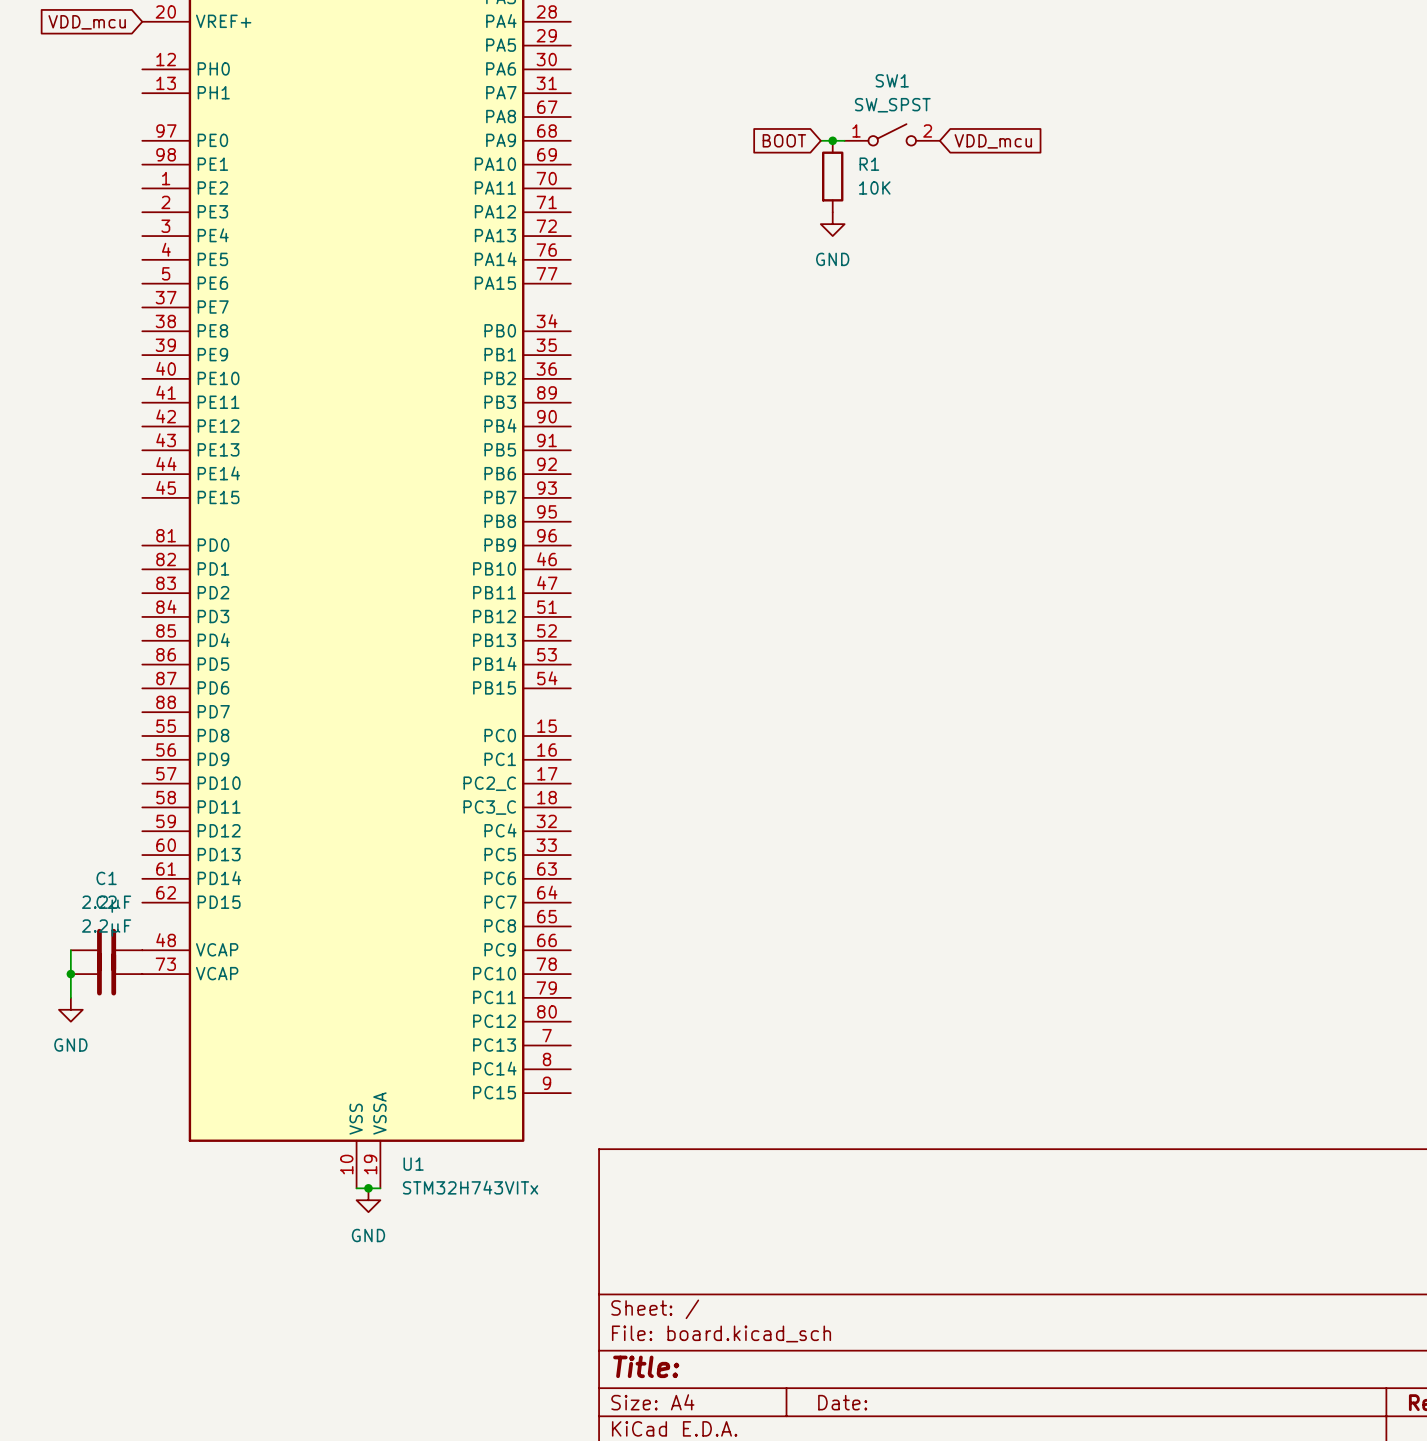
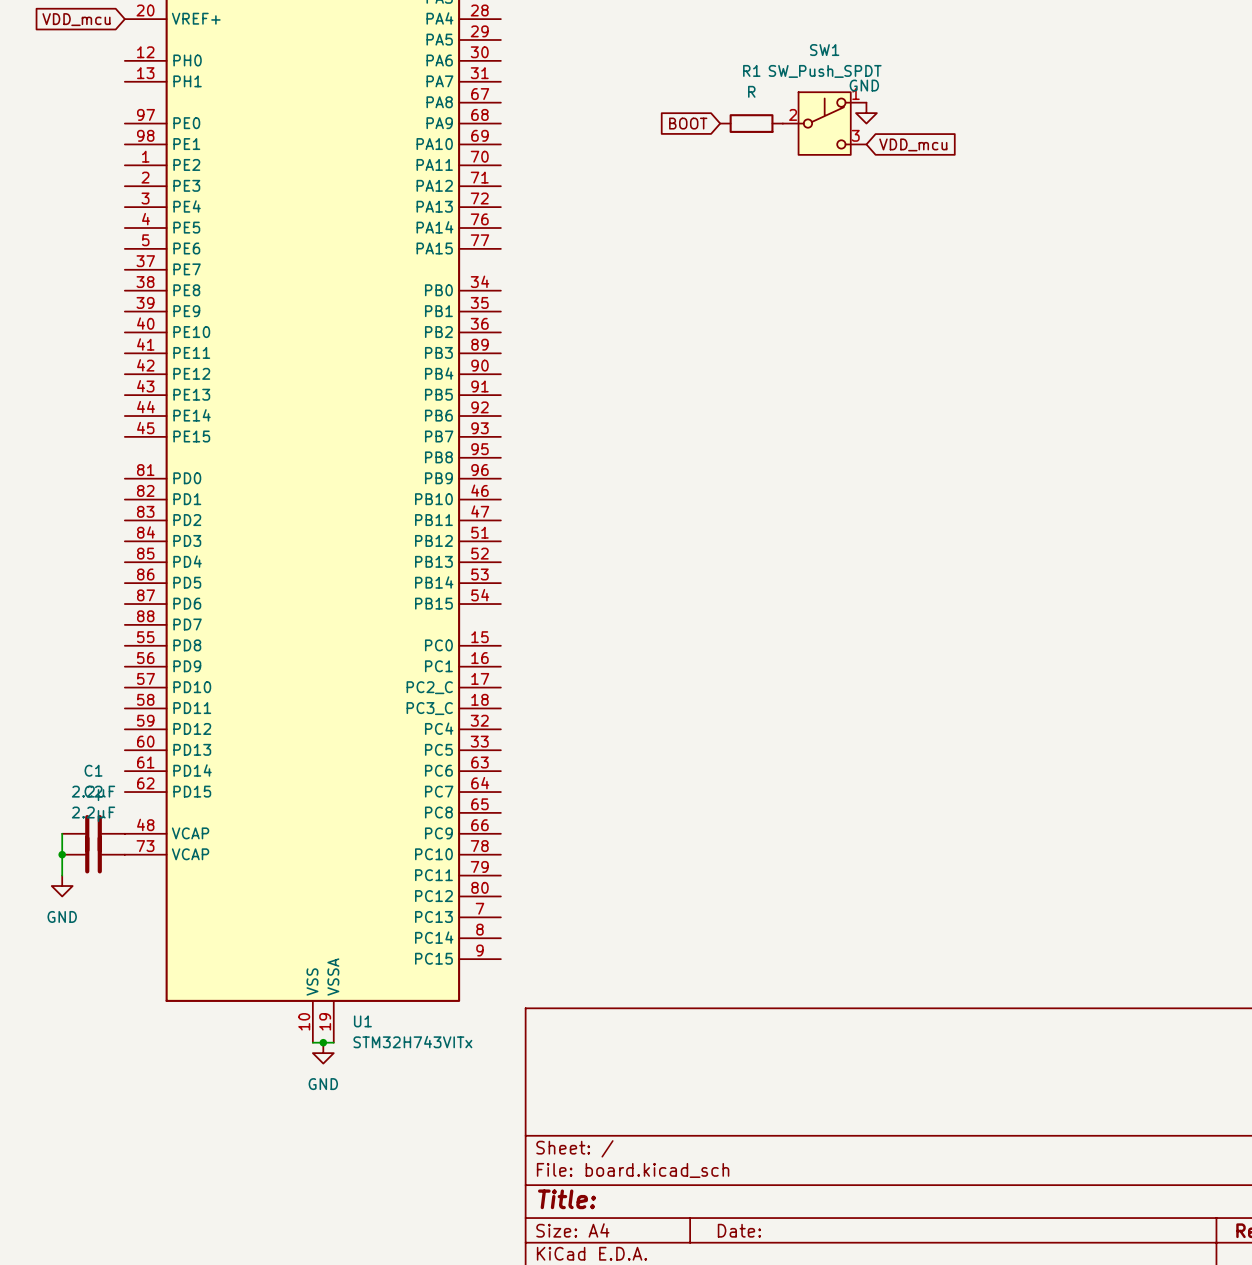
SW1 name position: SW1 (892, 80) -> SW1 (824, 50)
SW1 value: SW_SPST (892, 105) -> SW_Push_SPDT (825, 71)
SW1 symbol: [844, 124, 940, 146] -> [782, 92, 867, 155]
junction: (832, 140) -> none
global label position: VDD_mcu (993, 141) -> VDD_mcu (913, 144)
R1 name position: R1 (869, 164) -> R1 (751, 70)
R1 rotation: 0° (832, 176) -> 90° clockwise (751, 123)
R1 position: (832, 176) -> (751, 123)
R1 value: 10K (874, 187) -> R (751, 91)
power symbol position: GND (832, 224) -> GND (866, 113)
power symbol text position: GND (832, 259) -> GND (864, 85)

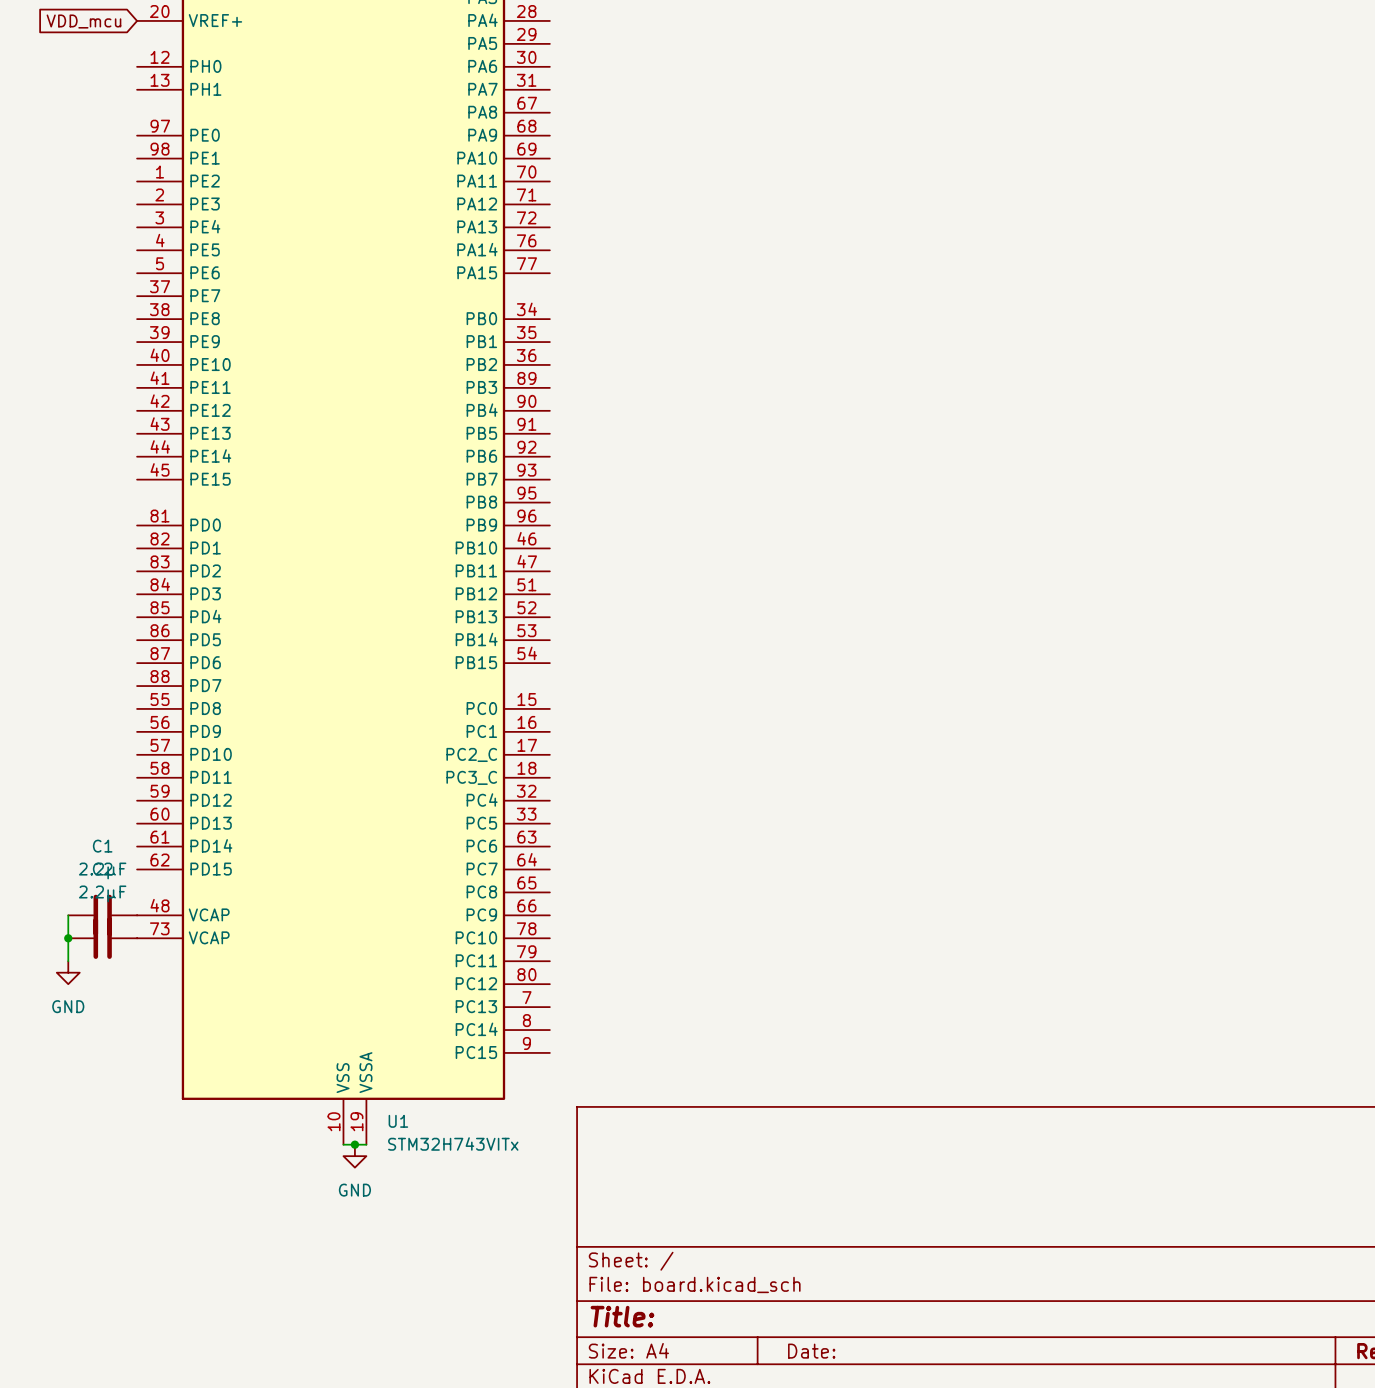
power symbol: GND (866, 113) -> none
global label: BOOT (688, 123) -> none
R1: R (751, 123) -> none
SW1: SW_Push_SPDT (824, 123) -> none
global label: VDD_mcu (913, 144) -> none

